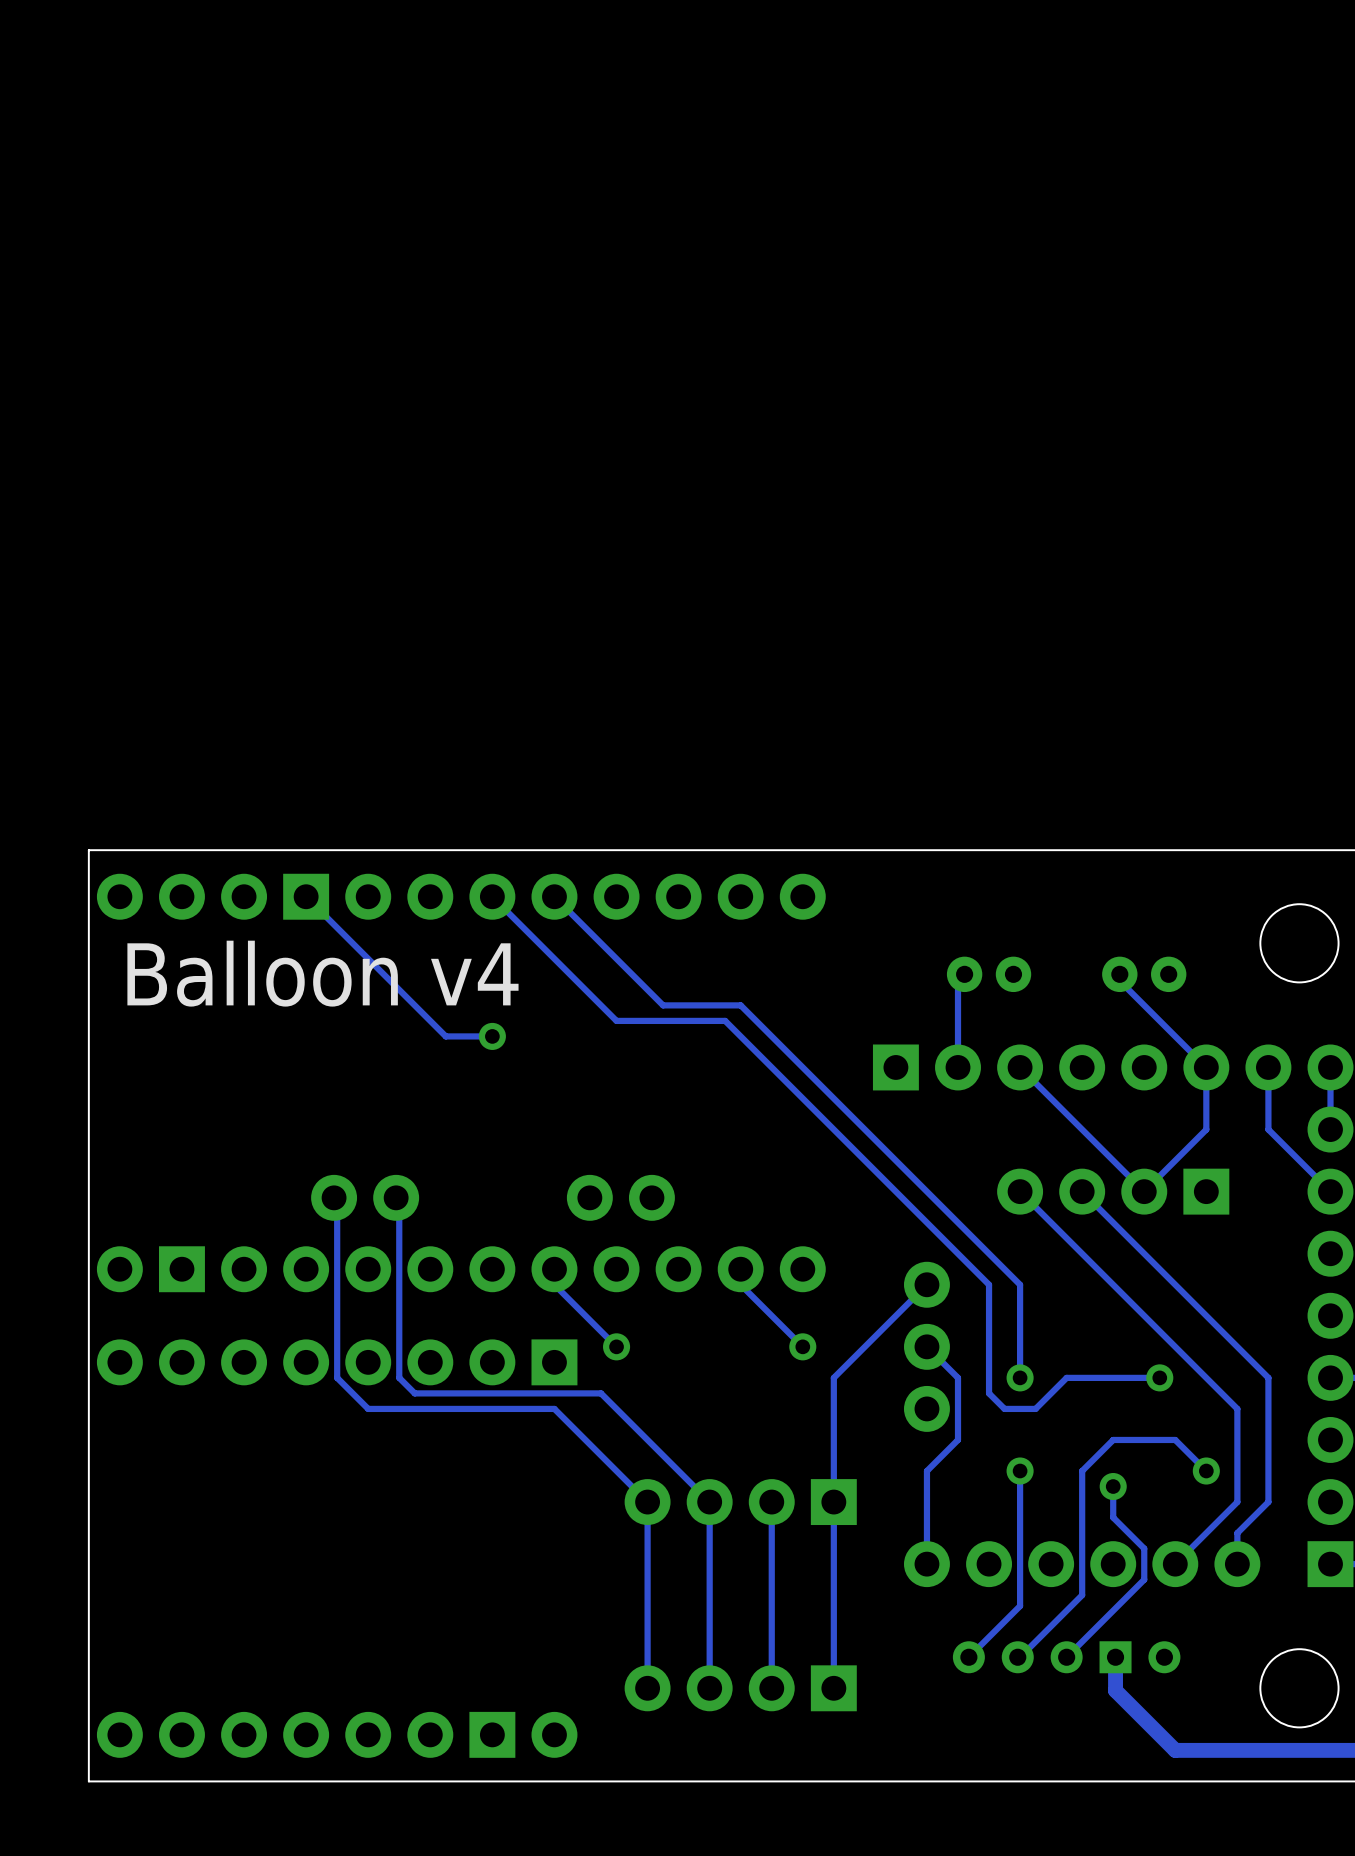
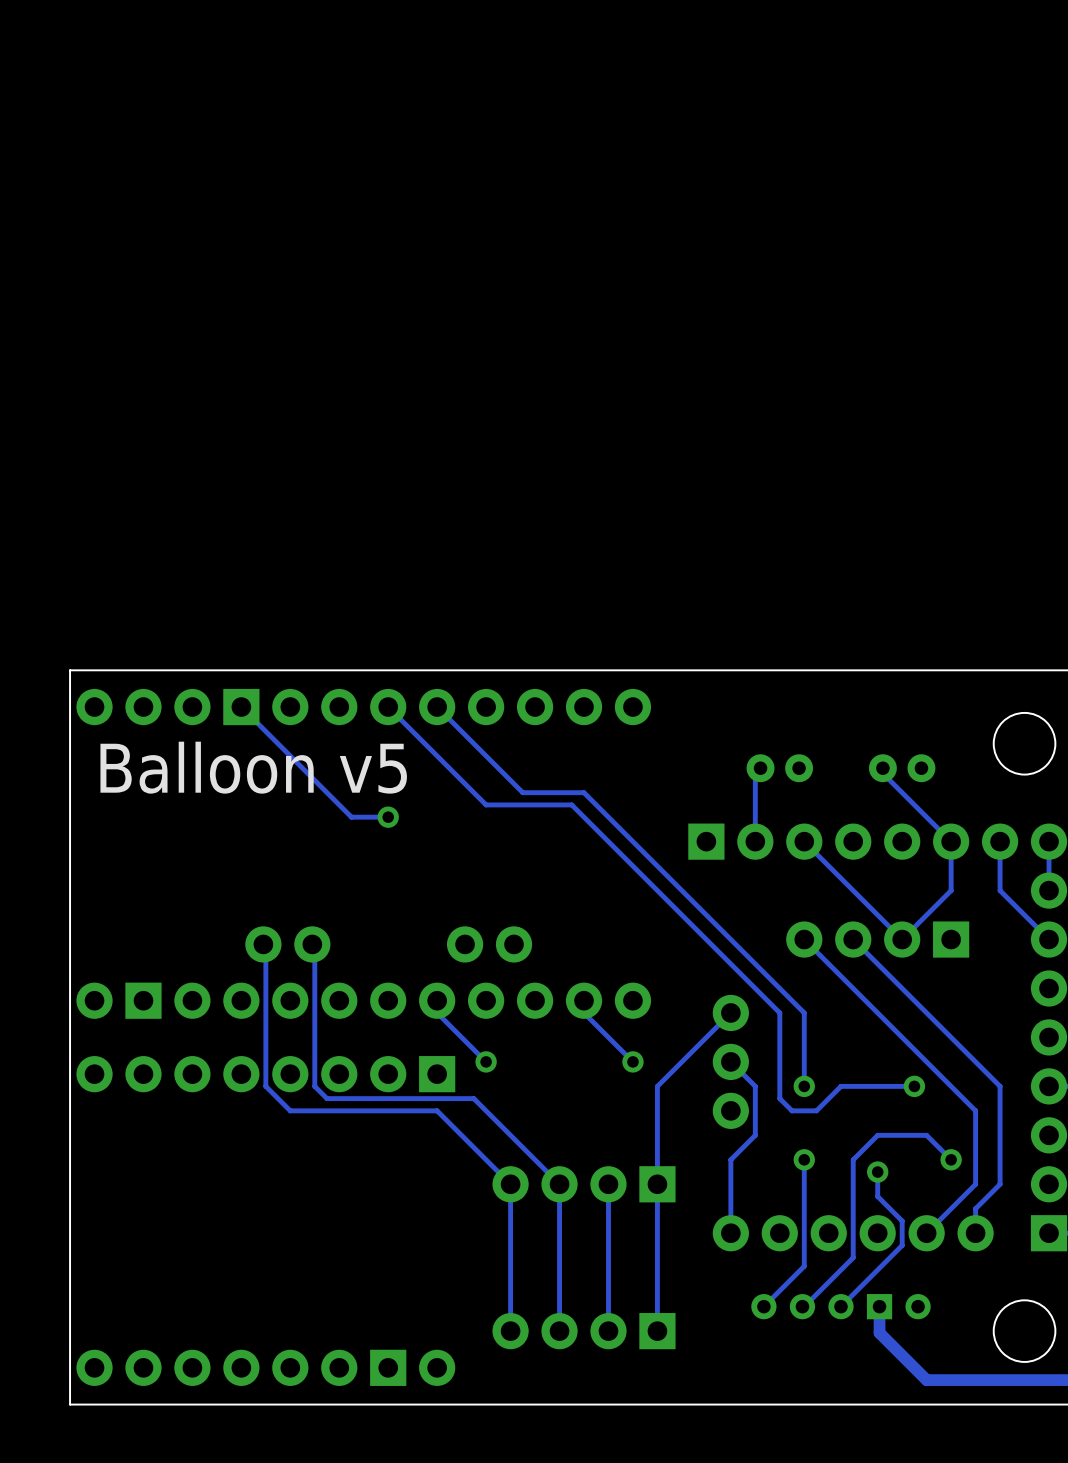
text: Balloon v4 (322, 973) -> Balloon v5 (253, 767)

